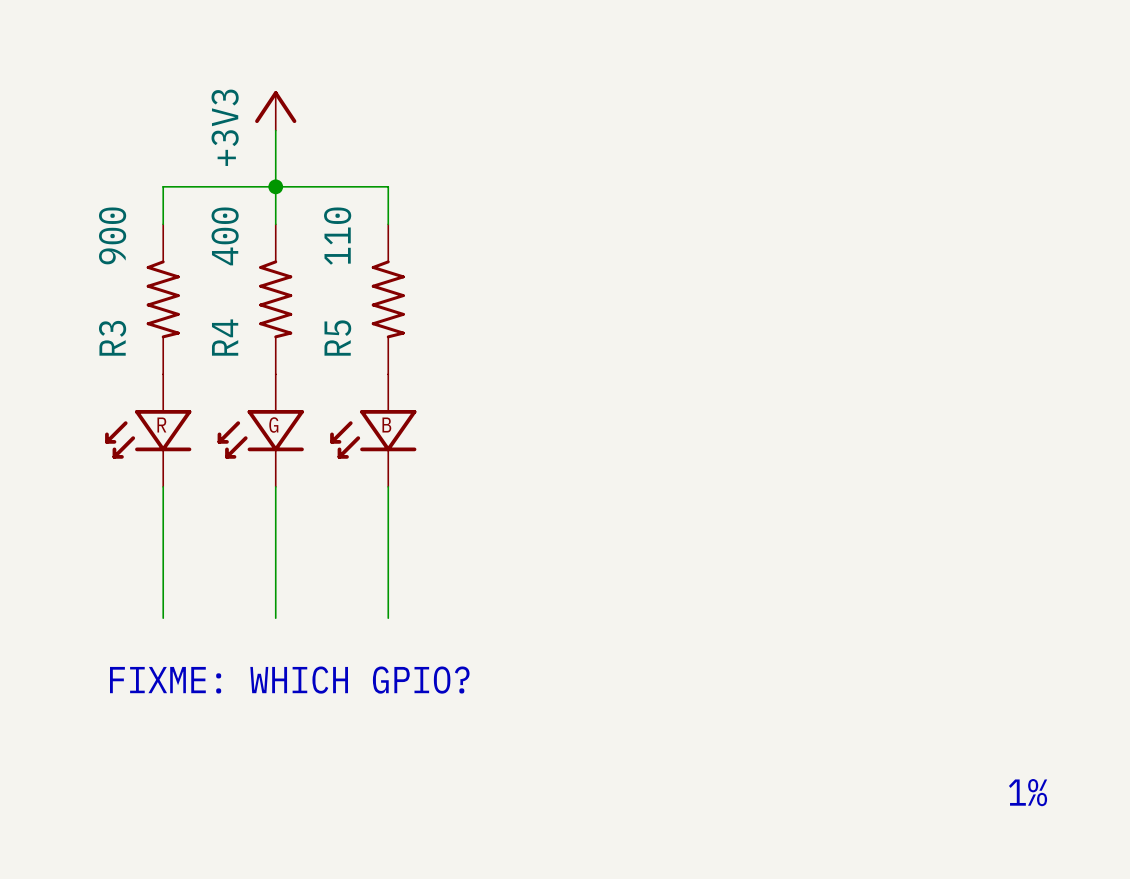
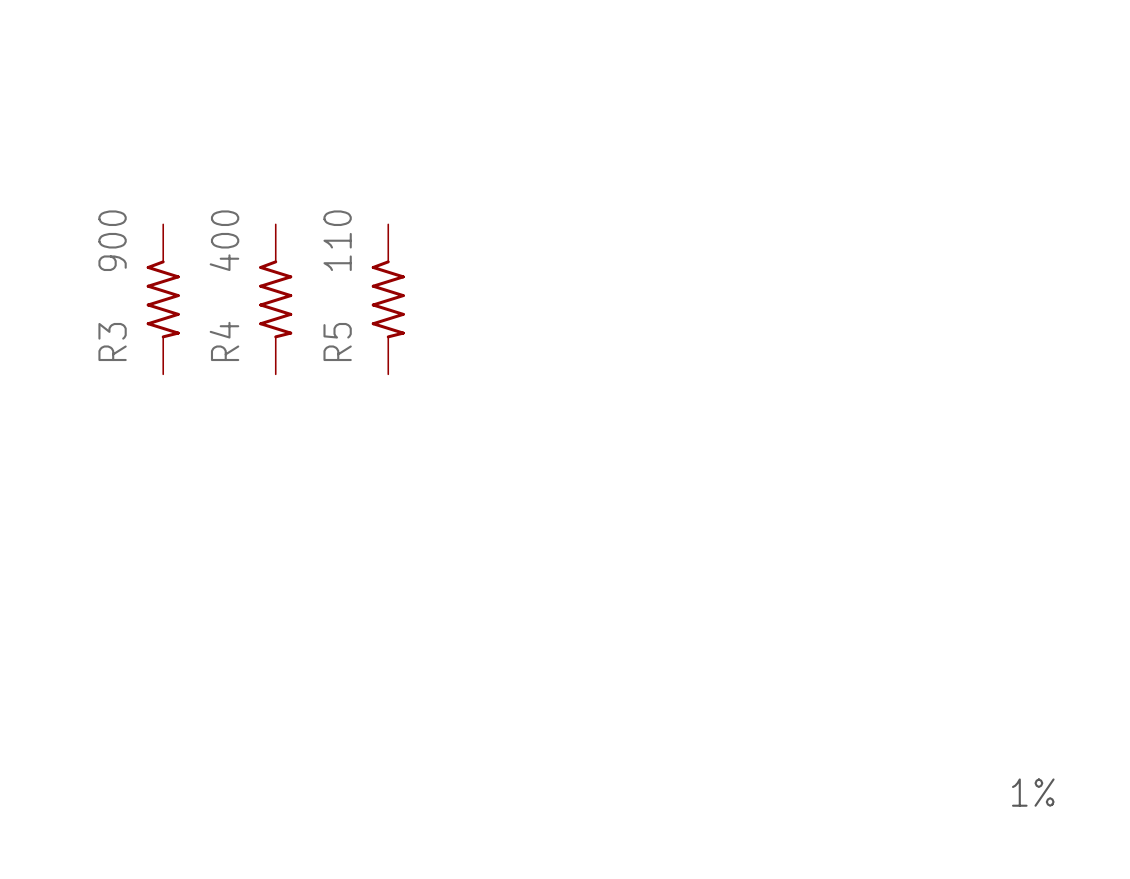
power symbol: +3V3 (275, 110) -> none
wire: (275, 130) (275, 224) -> none
junction: (275, 186) -> none
wire: (163, 224) (163, 186) (388, 186) (388, 224) -> none
part: (148, 430) -> none
part: (260, 430) -> none
part: (373, 430) -> none
wire: (163, 486) (163, 618) -> none
wire: (275, 486) (275, 618) -> none
wire: (388, 486) (388, 618) -> none
text: FIXME: WHICH GPIO? (289, 680) -> none

